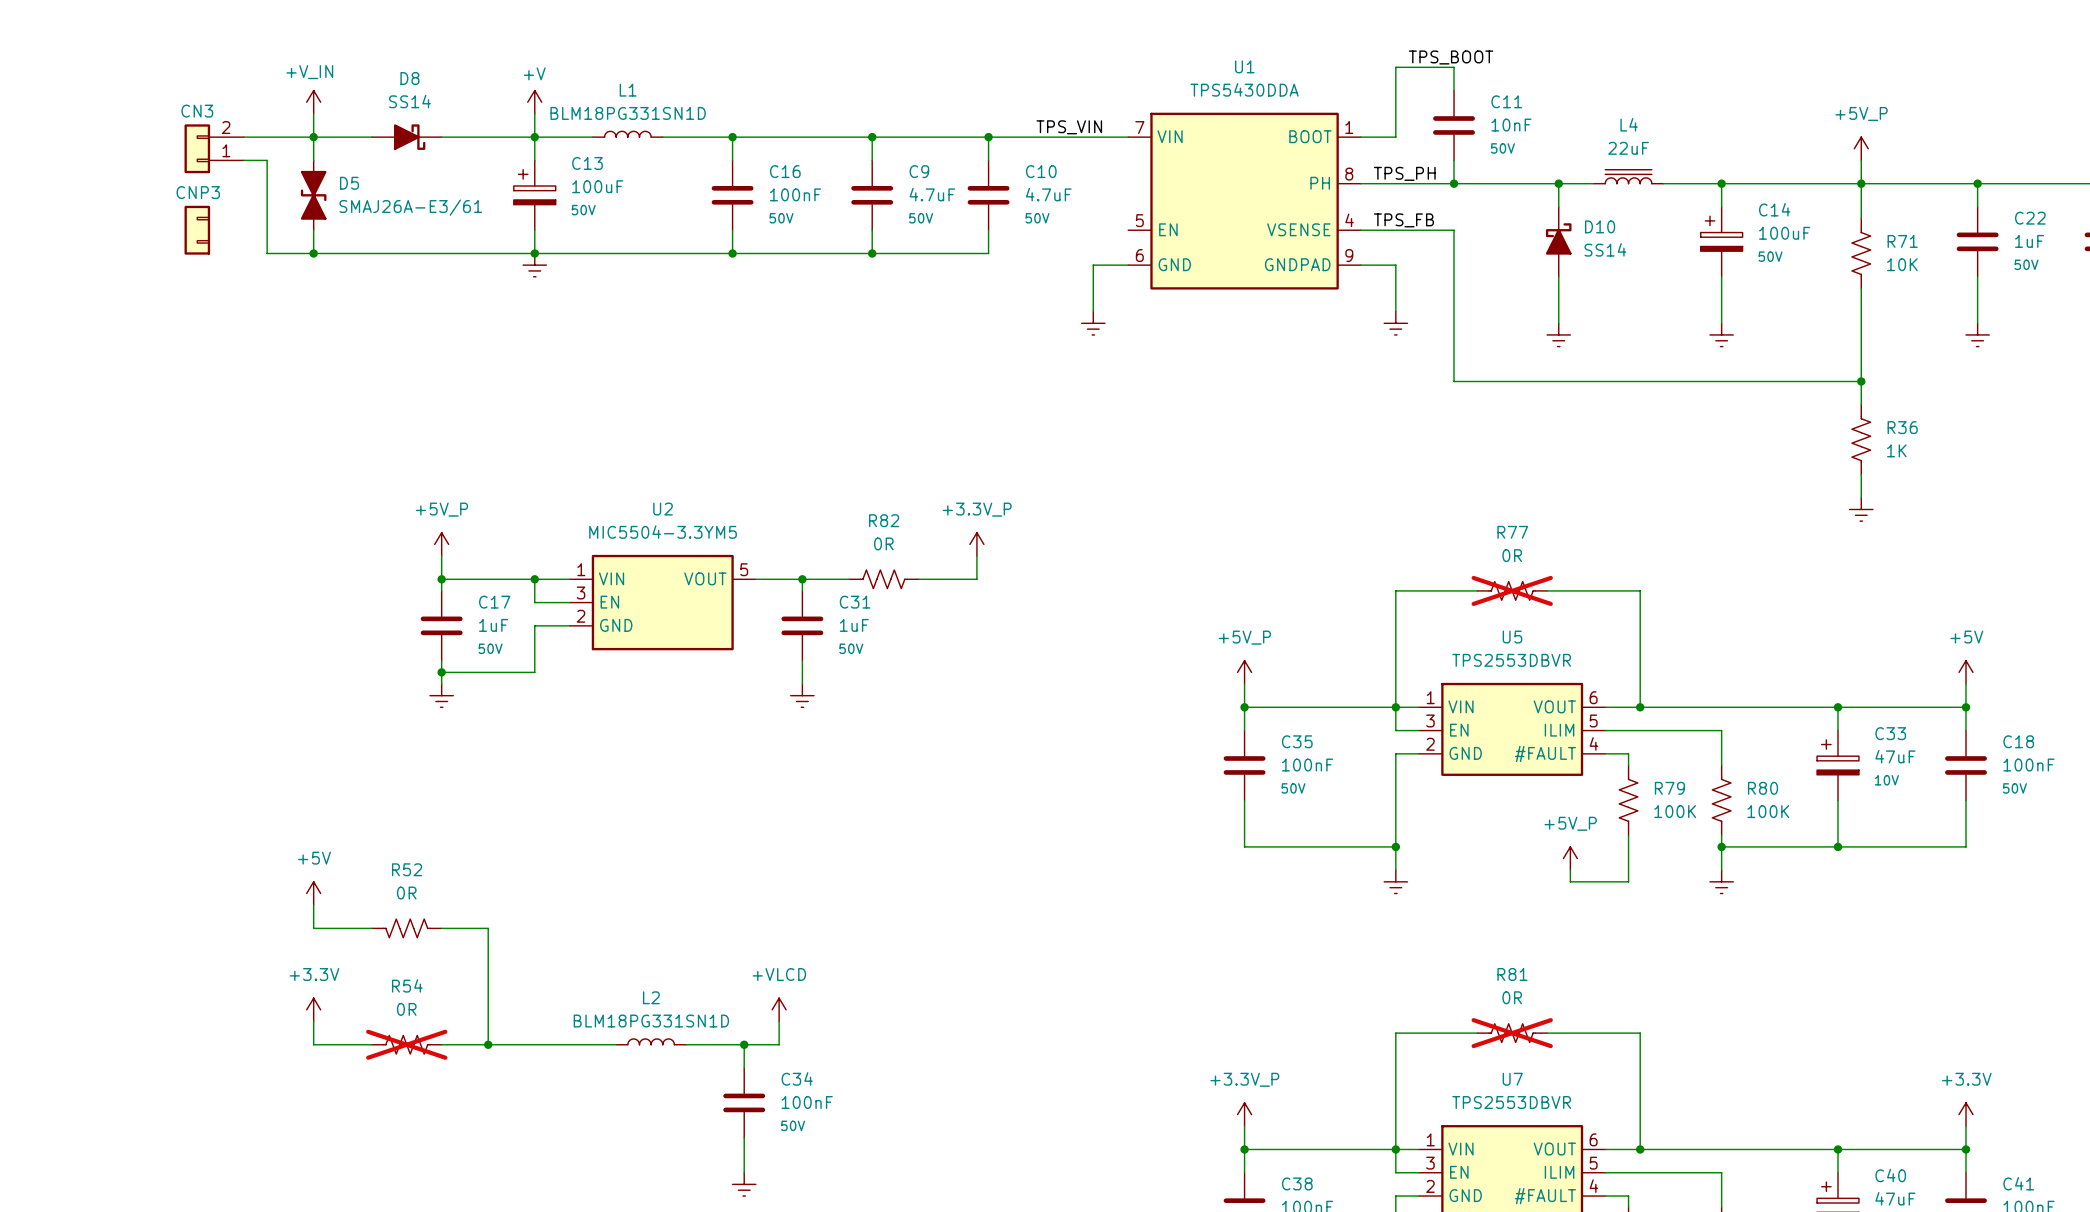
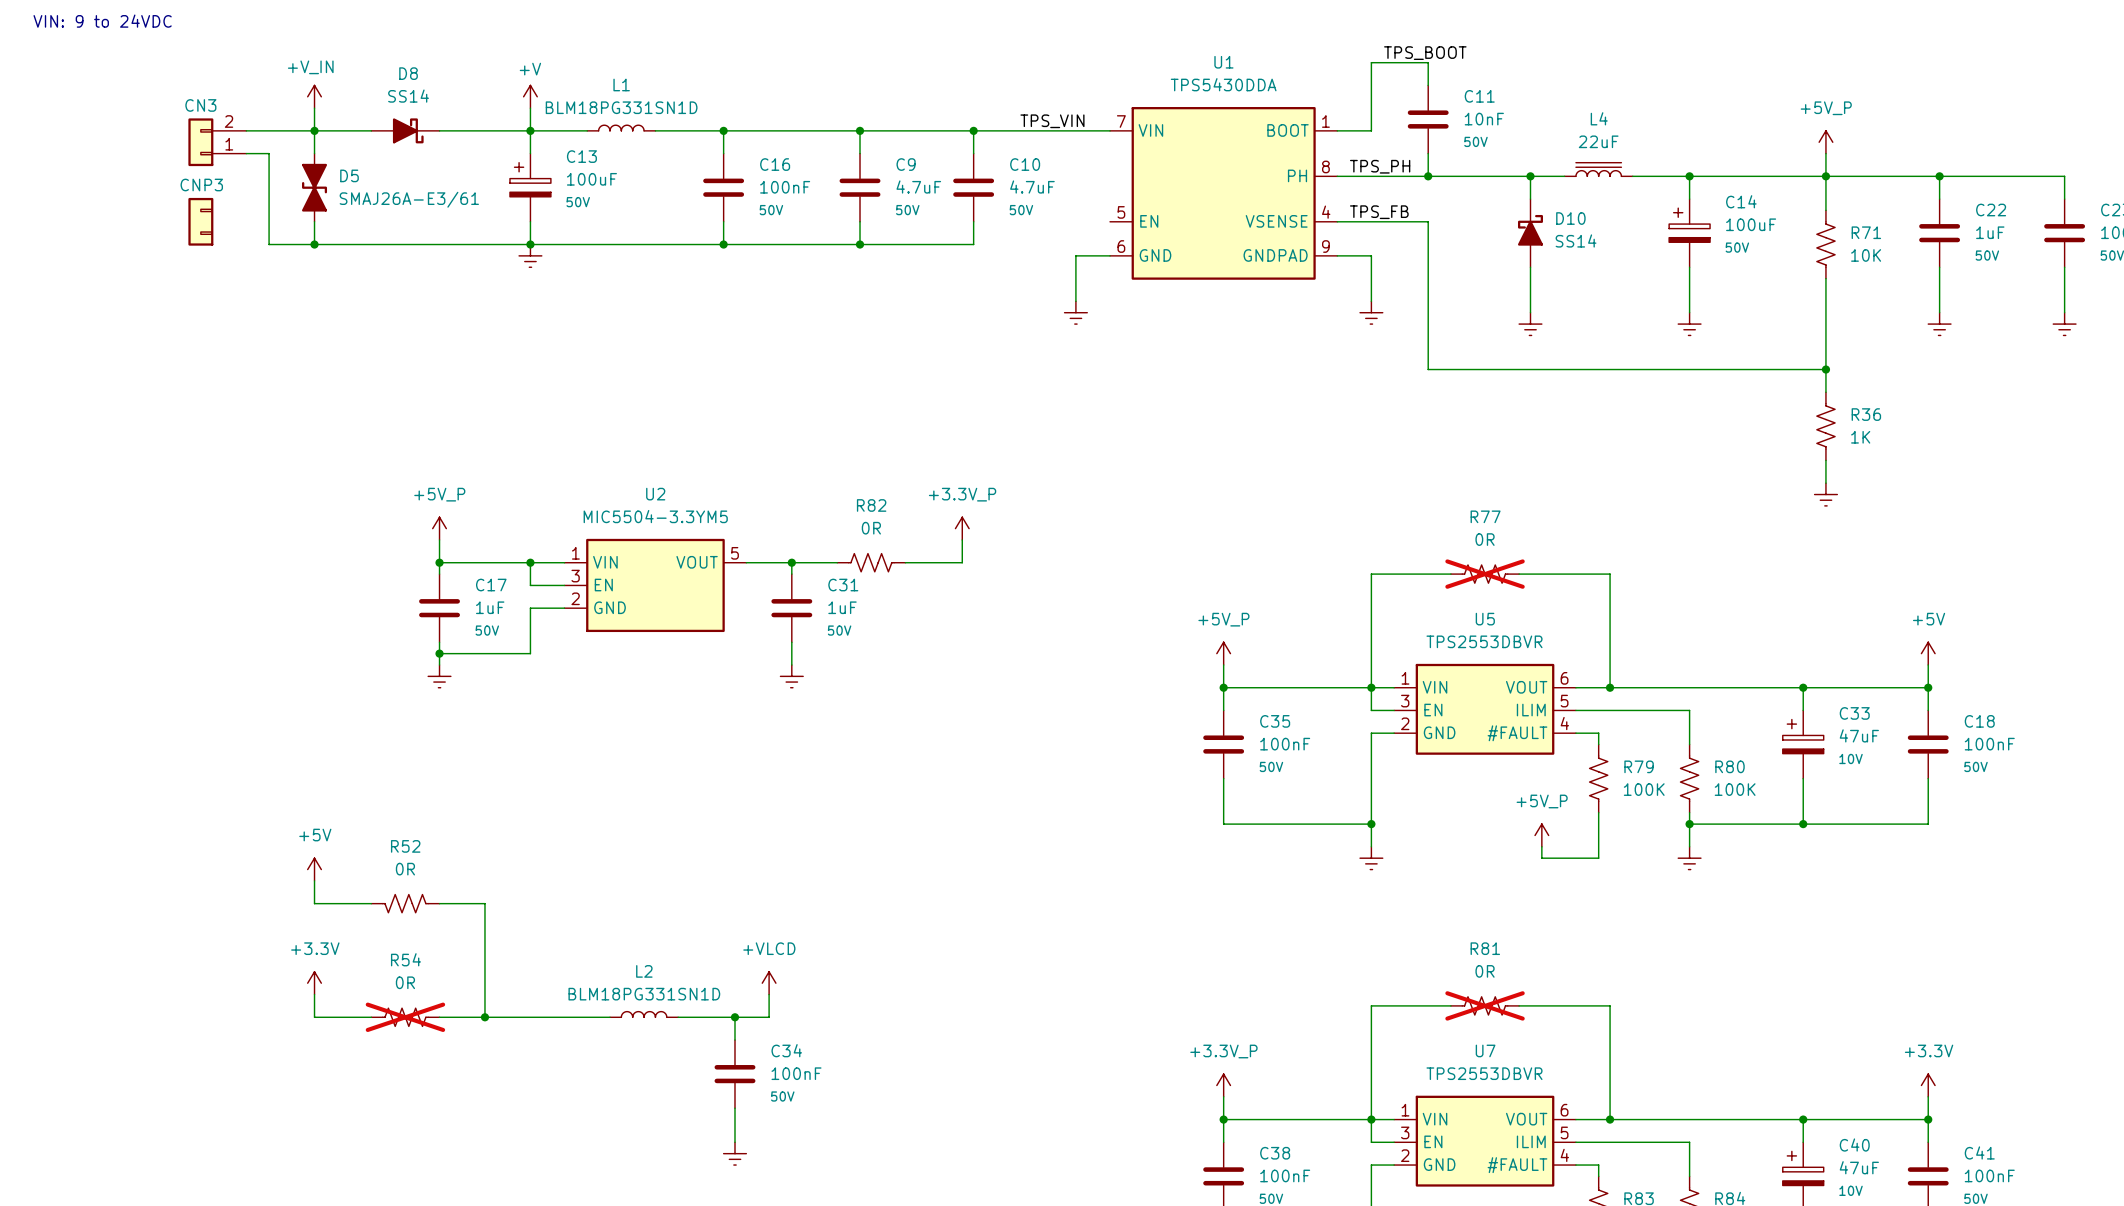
text: none -> VIN: 9 to 24VDC (102, 21)

